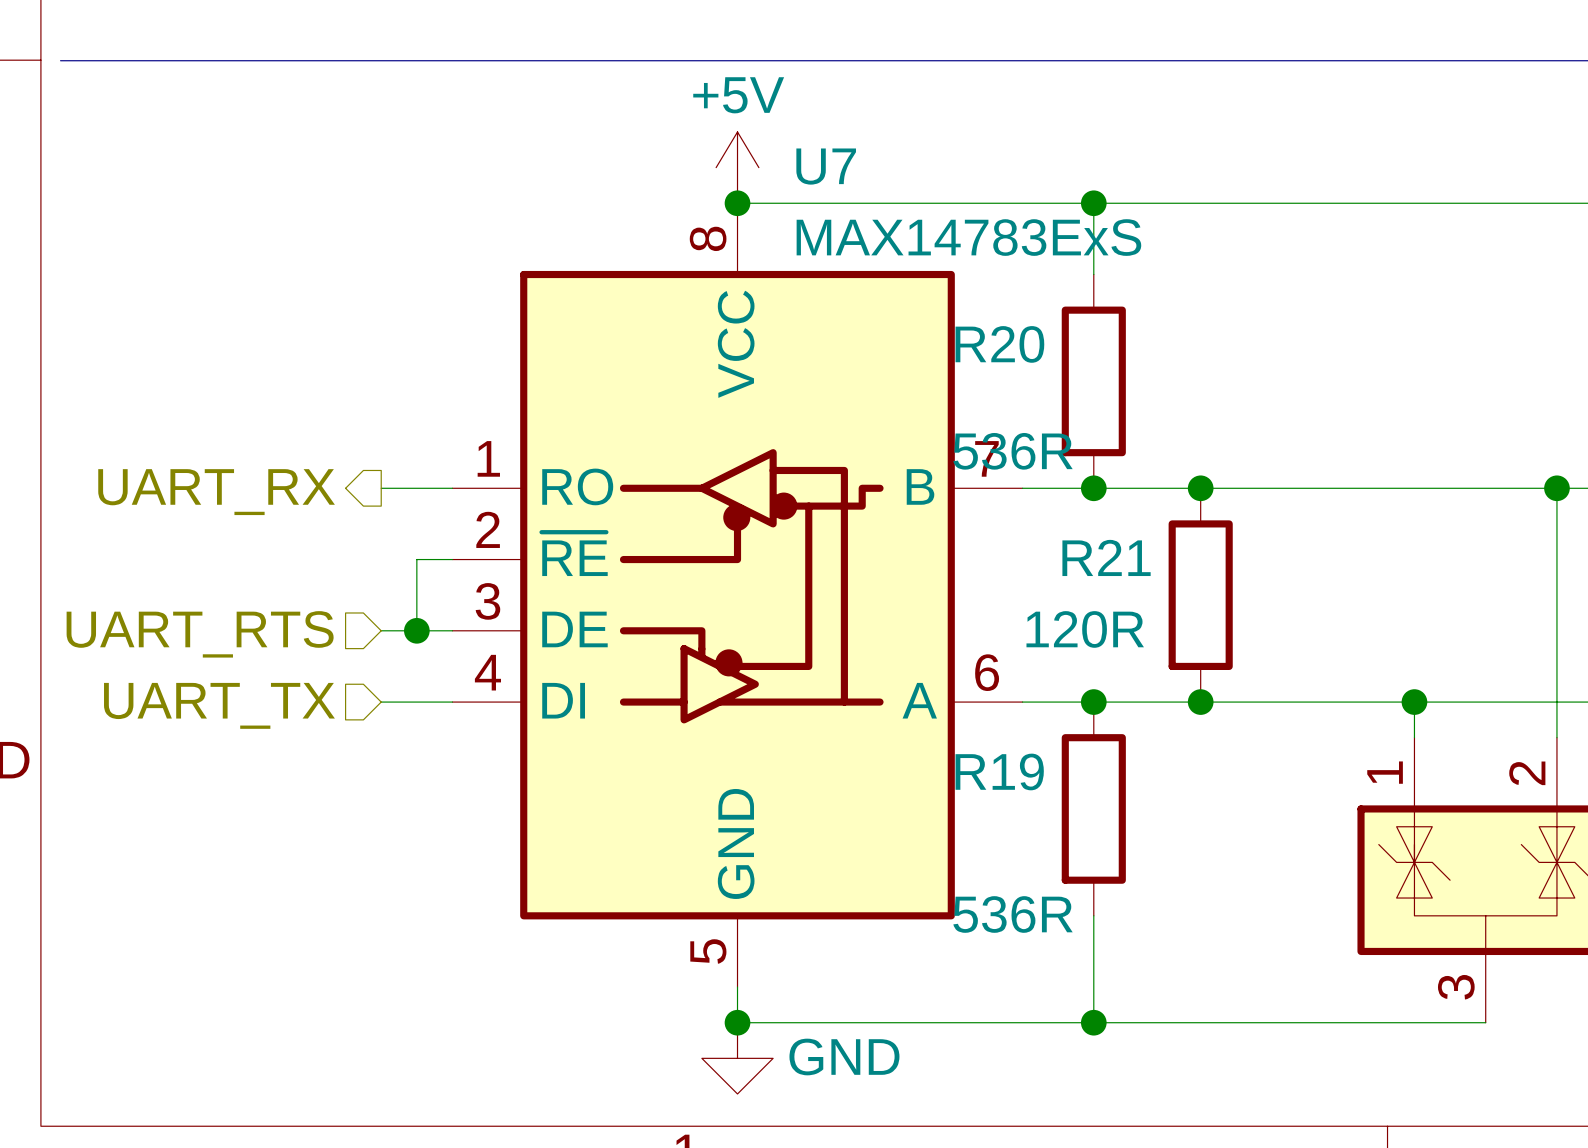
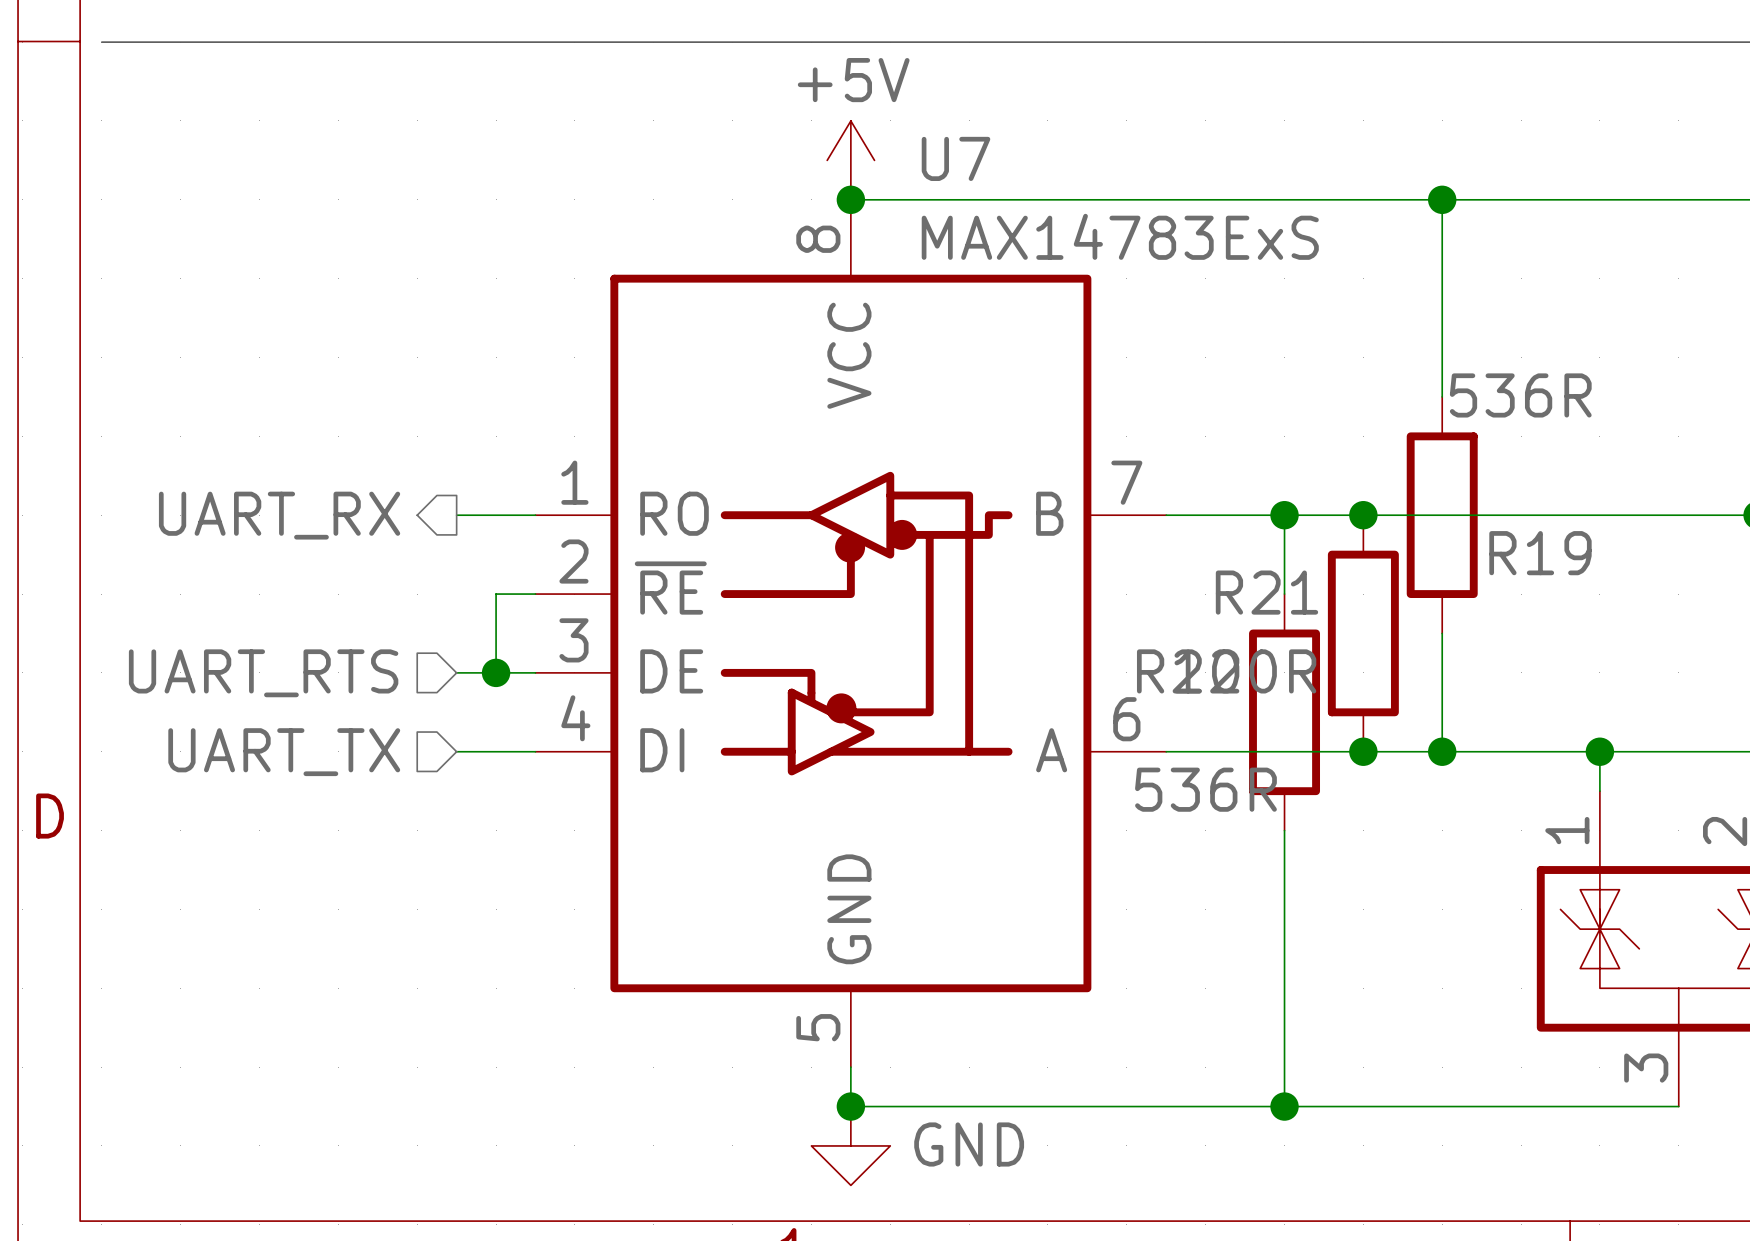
wire: (1093, 203) (1093, 274) -> (1284, 515) (1284, 594)
junction: (1093, 203) -> none
wire: none -> (1442, 199) (1442, 396)
junction: none -> (1442, 199)
R20 position: (1093, 381) -> (1284, 712)
junction position: (1093, 488) -> (1284, 515)
junction: (1093, 702) -> none
junction: none -> (1442, 751)
R19 name position: R19 (999, 771) -> R19 (1540, 553)
wire: none -> (1284, 830) (1284, 1106)
R19 position: (1093, 808) -> (1442, 515)
R19 value position: 536R (1013, 914) -> 536R (1520, 395)
wire: (1093, 915) (1093, 1022) -> (1442, 633) (1442, 751)
junction position: (1093, 1022) -> (1284, 1106)

